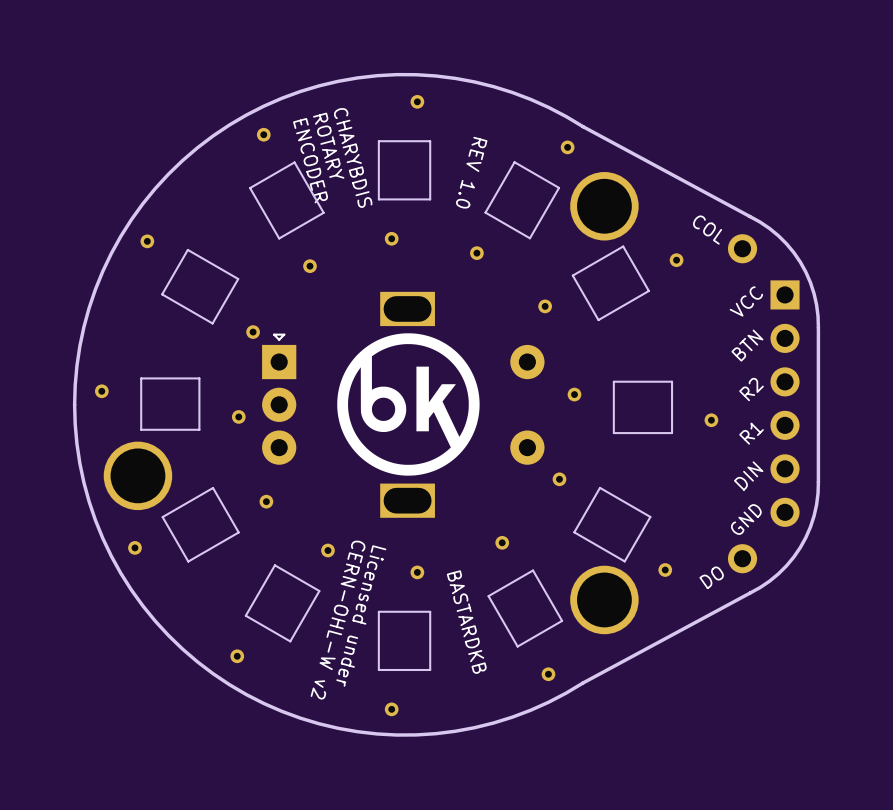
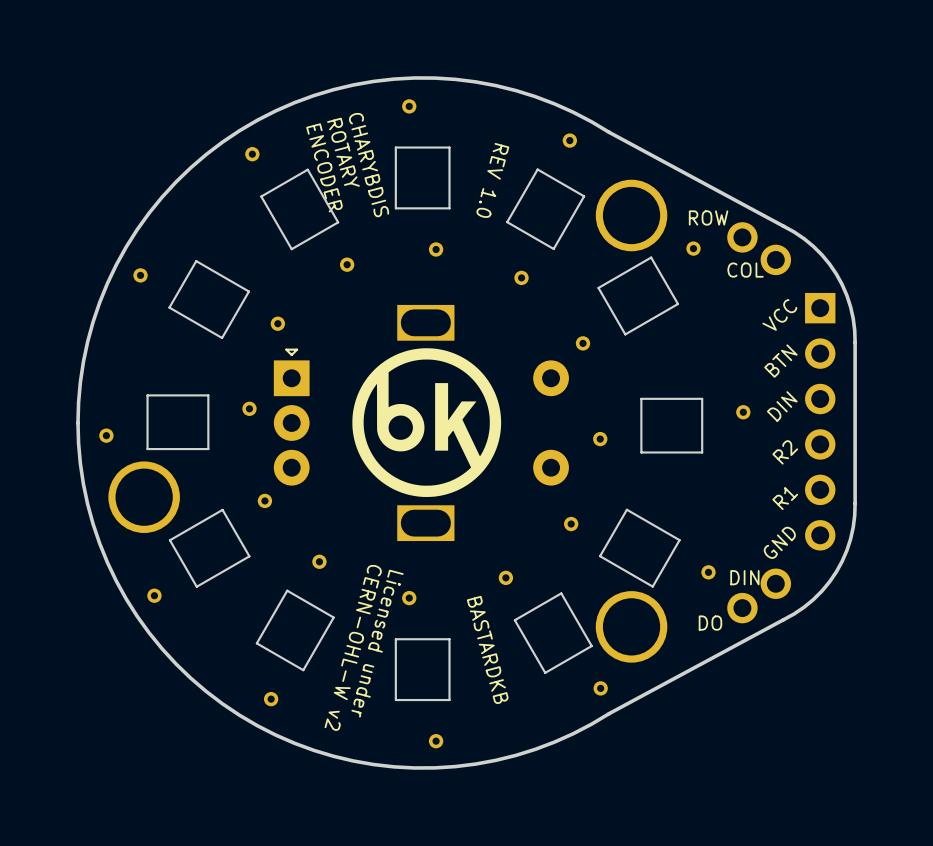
part footprint: [377, 94, 432, 246] -> [394, 99, 451, 257]
part footprint: [249, 127, 325, 274] -> [245, 147, 355, 272]
part footprint: [470, 140, 575, 260] -> [506, 133, 586, 286]
text: none -> ROW (708, 217)
part: none -> (742, 237)
text rotation: 0° (707, 230) -> 35° counterclockwise (745, 270)
part footprint: [140, 234, 260, 339] -> [133, 260, 286, 340]
part footprint: [538, 245, 684, 322] -> [575, 241, 701, 351]
part footprint: [94, 377, 246, 431] -> [99, 394, 257, 451]
part footprint: [567, 380, 719, 435] -> [593, 397, 751, 454]
text: R2 (751, 389) -> DIN (782, 406)
text: R1 (751, 433) -> R2 (785, 452)
part footprint: [552, 472, 673, 577] -> [564, 508, 716, 588]
text: DIN (748, 476) -> R1 (785, 498)
part footprint: [128, 486, 274, 563] -> [147, 493, 273, 603]
part footprint: [487, 535, 564, 682] -> [498, 570, 608, 696]
part footprint: [230, 543, 335, 664] -> [255, 554, 335, 707]
text: none -> DIN (744, 577)
part footprint: [377, 565, 432, 717] -> [394, 590, 451, 749]
text rotation: 0° (711, 577) -> 35° clockwise (710, 623)
part: none -> (742, 608)

